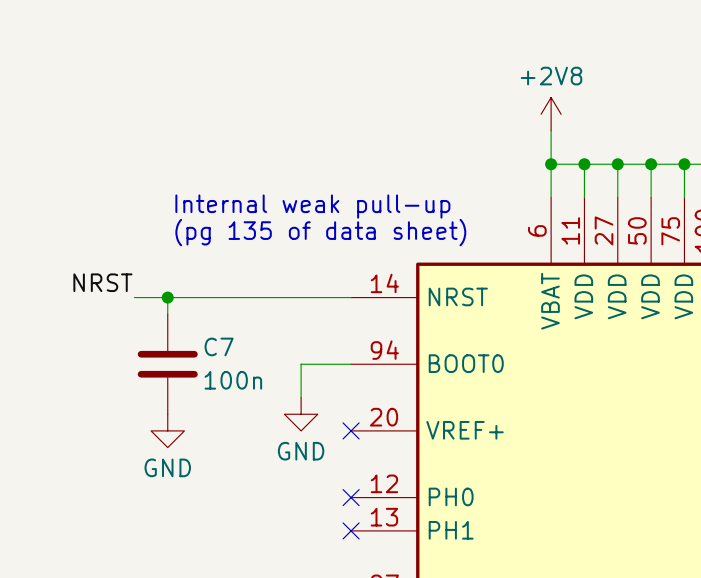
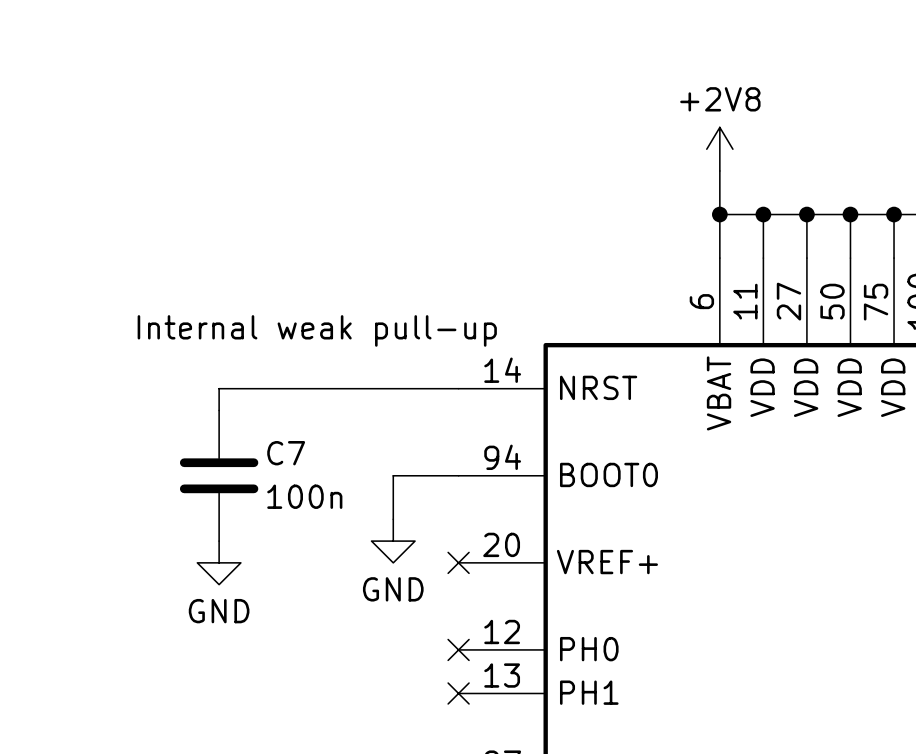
text position: Internal weak pull-up (312, 206) -> Internal weak pull-up (317, 330)
text: (pg 135 of data sheet) (320, 232) -> none
label: NRST (102, 282) -> none
wire: (134, 297) (167, 297) -> none
junction: (167, 297) -> none

